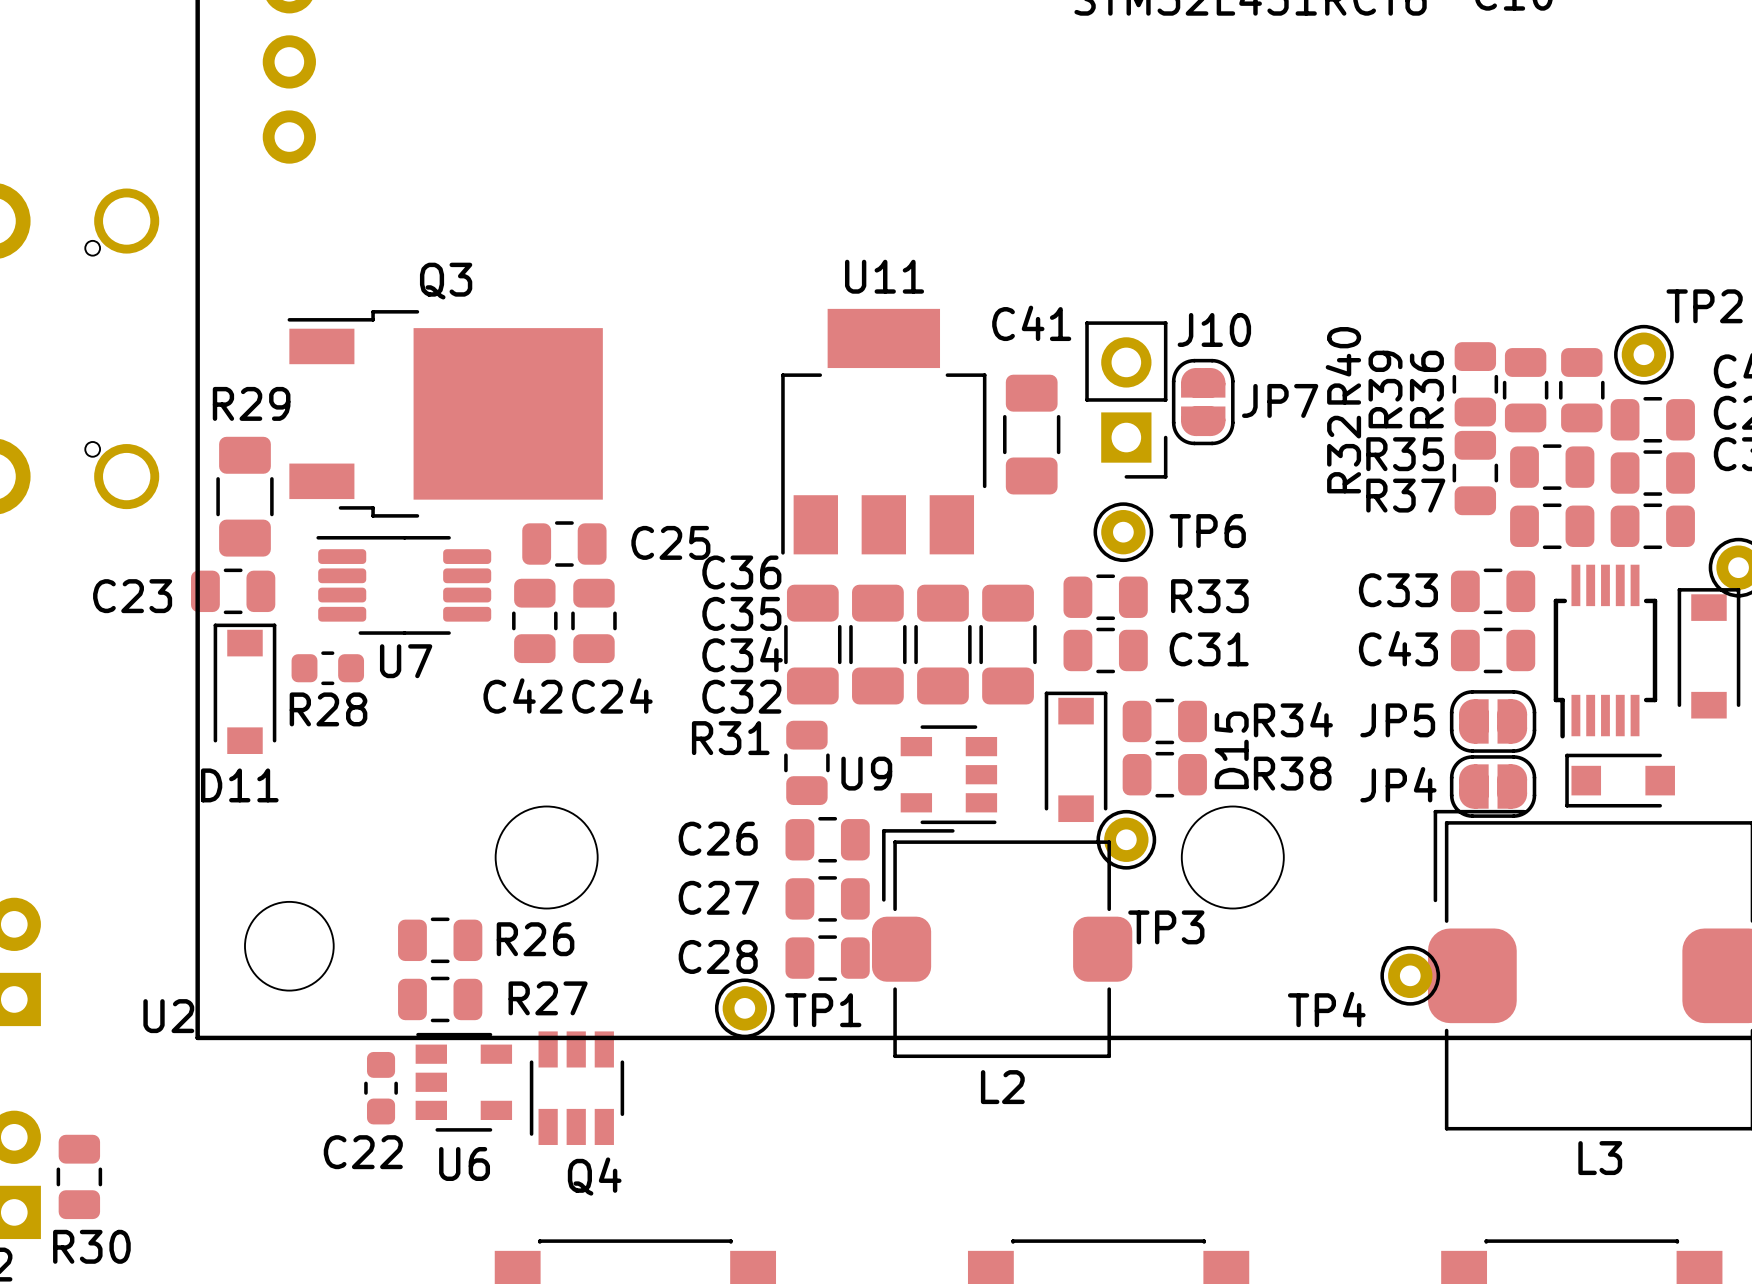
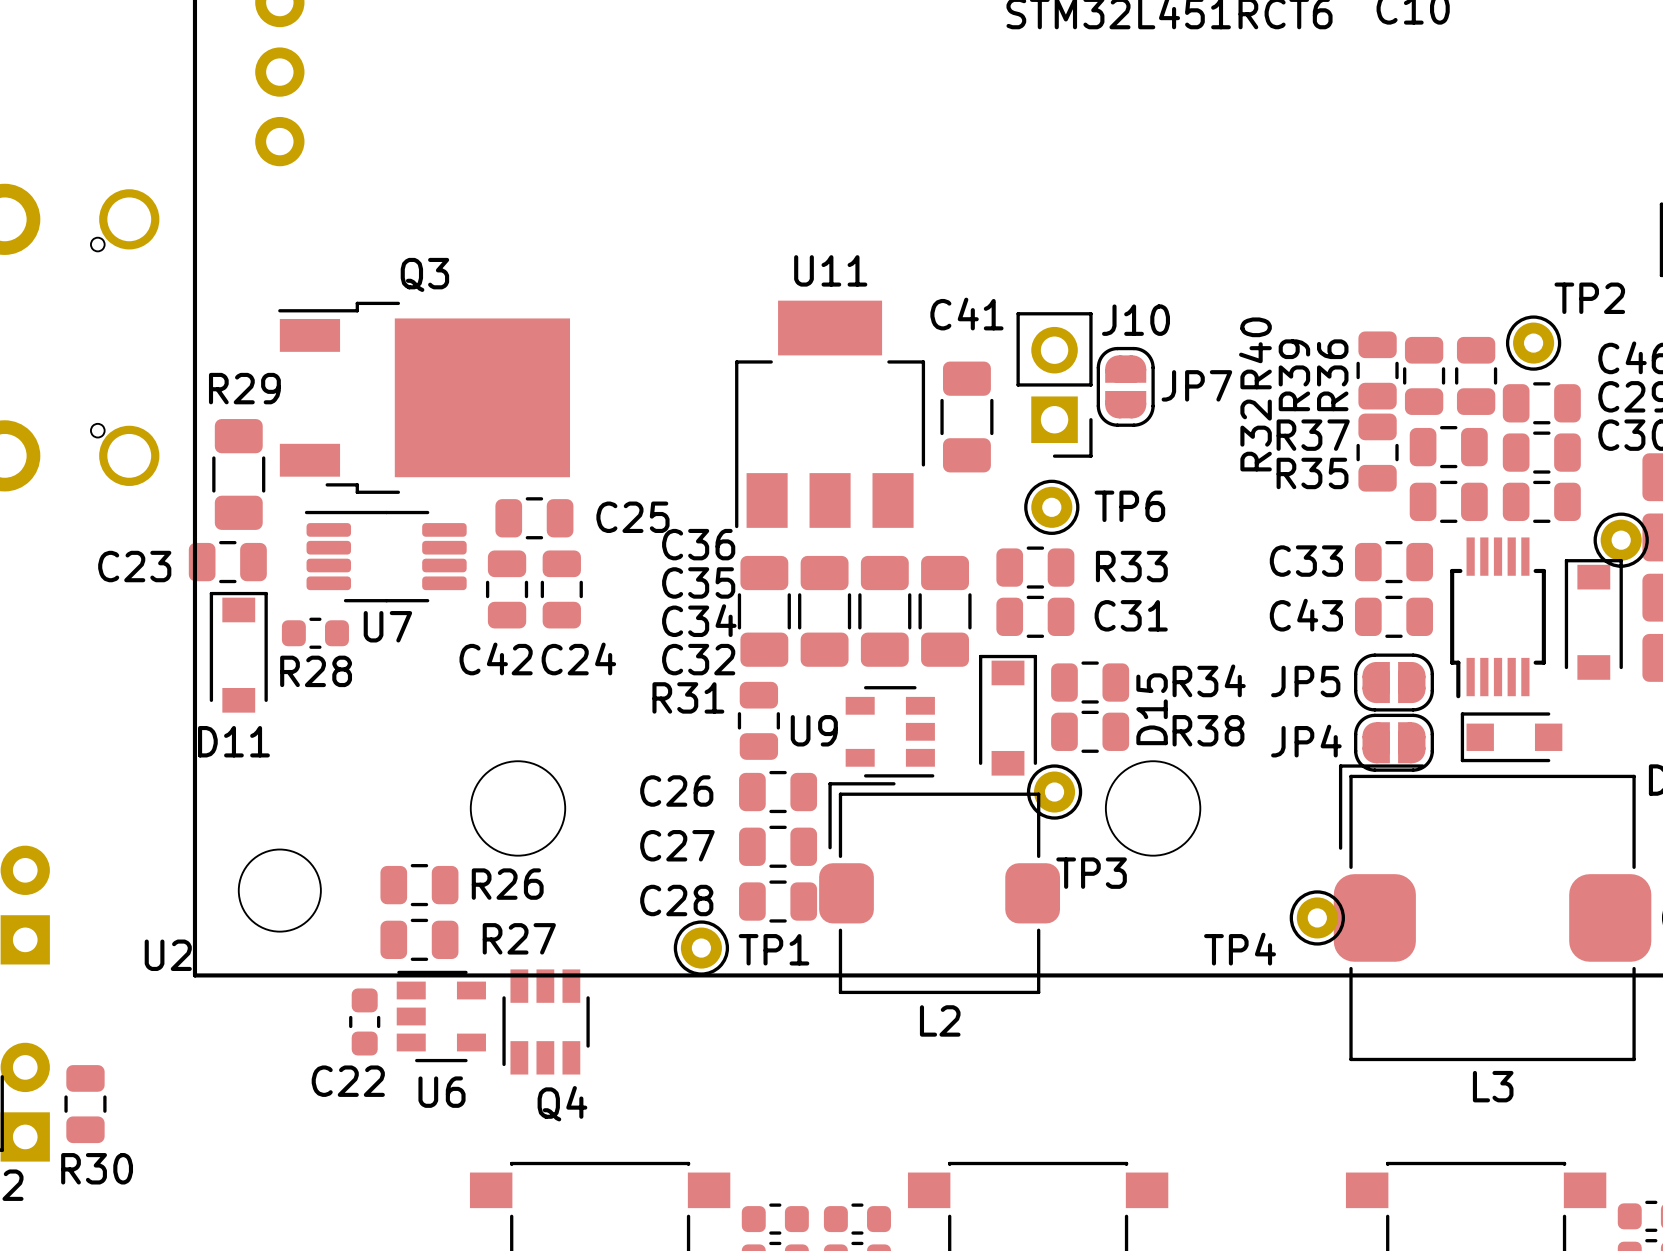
R35 name position: R35 (1405, 454) -> R35 (1312, 473)
R37 name position: R37 (1405, 495) -> R37 (1313, 435)

